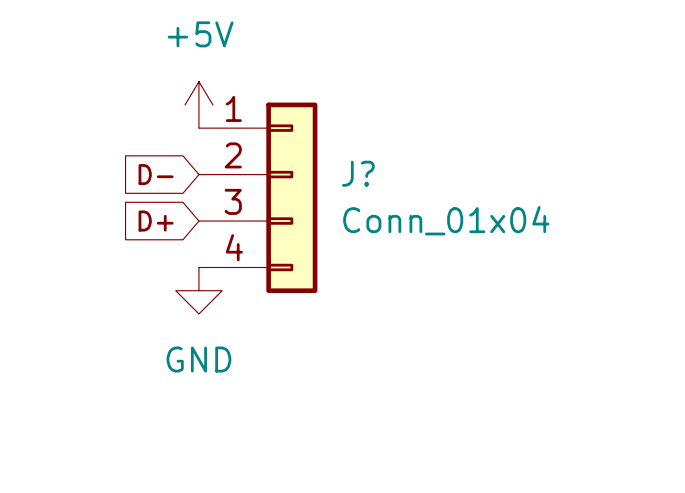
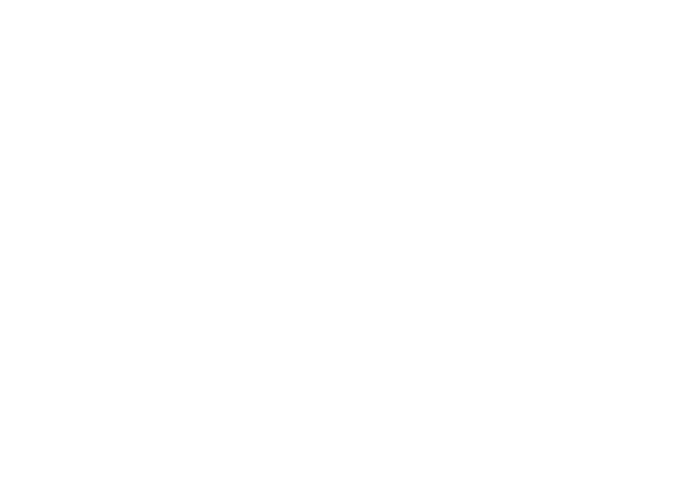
power symbol: +5V (198, 104) -> none
global label: D- (156, 174) -> none
J?: Conn_01x04 (258, 197) -> none
global label: D+ (156, 221) -> none
power symbol: GND (198, 290) -> none

